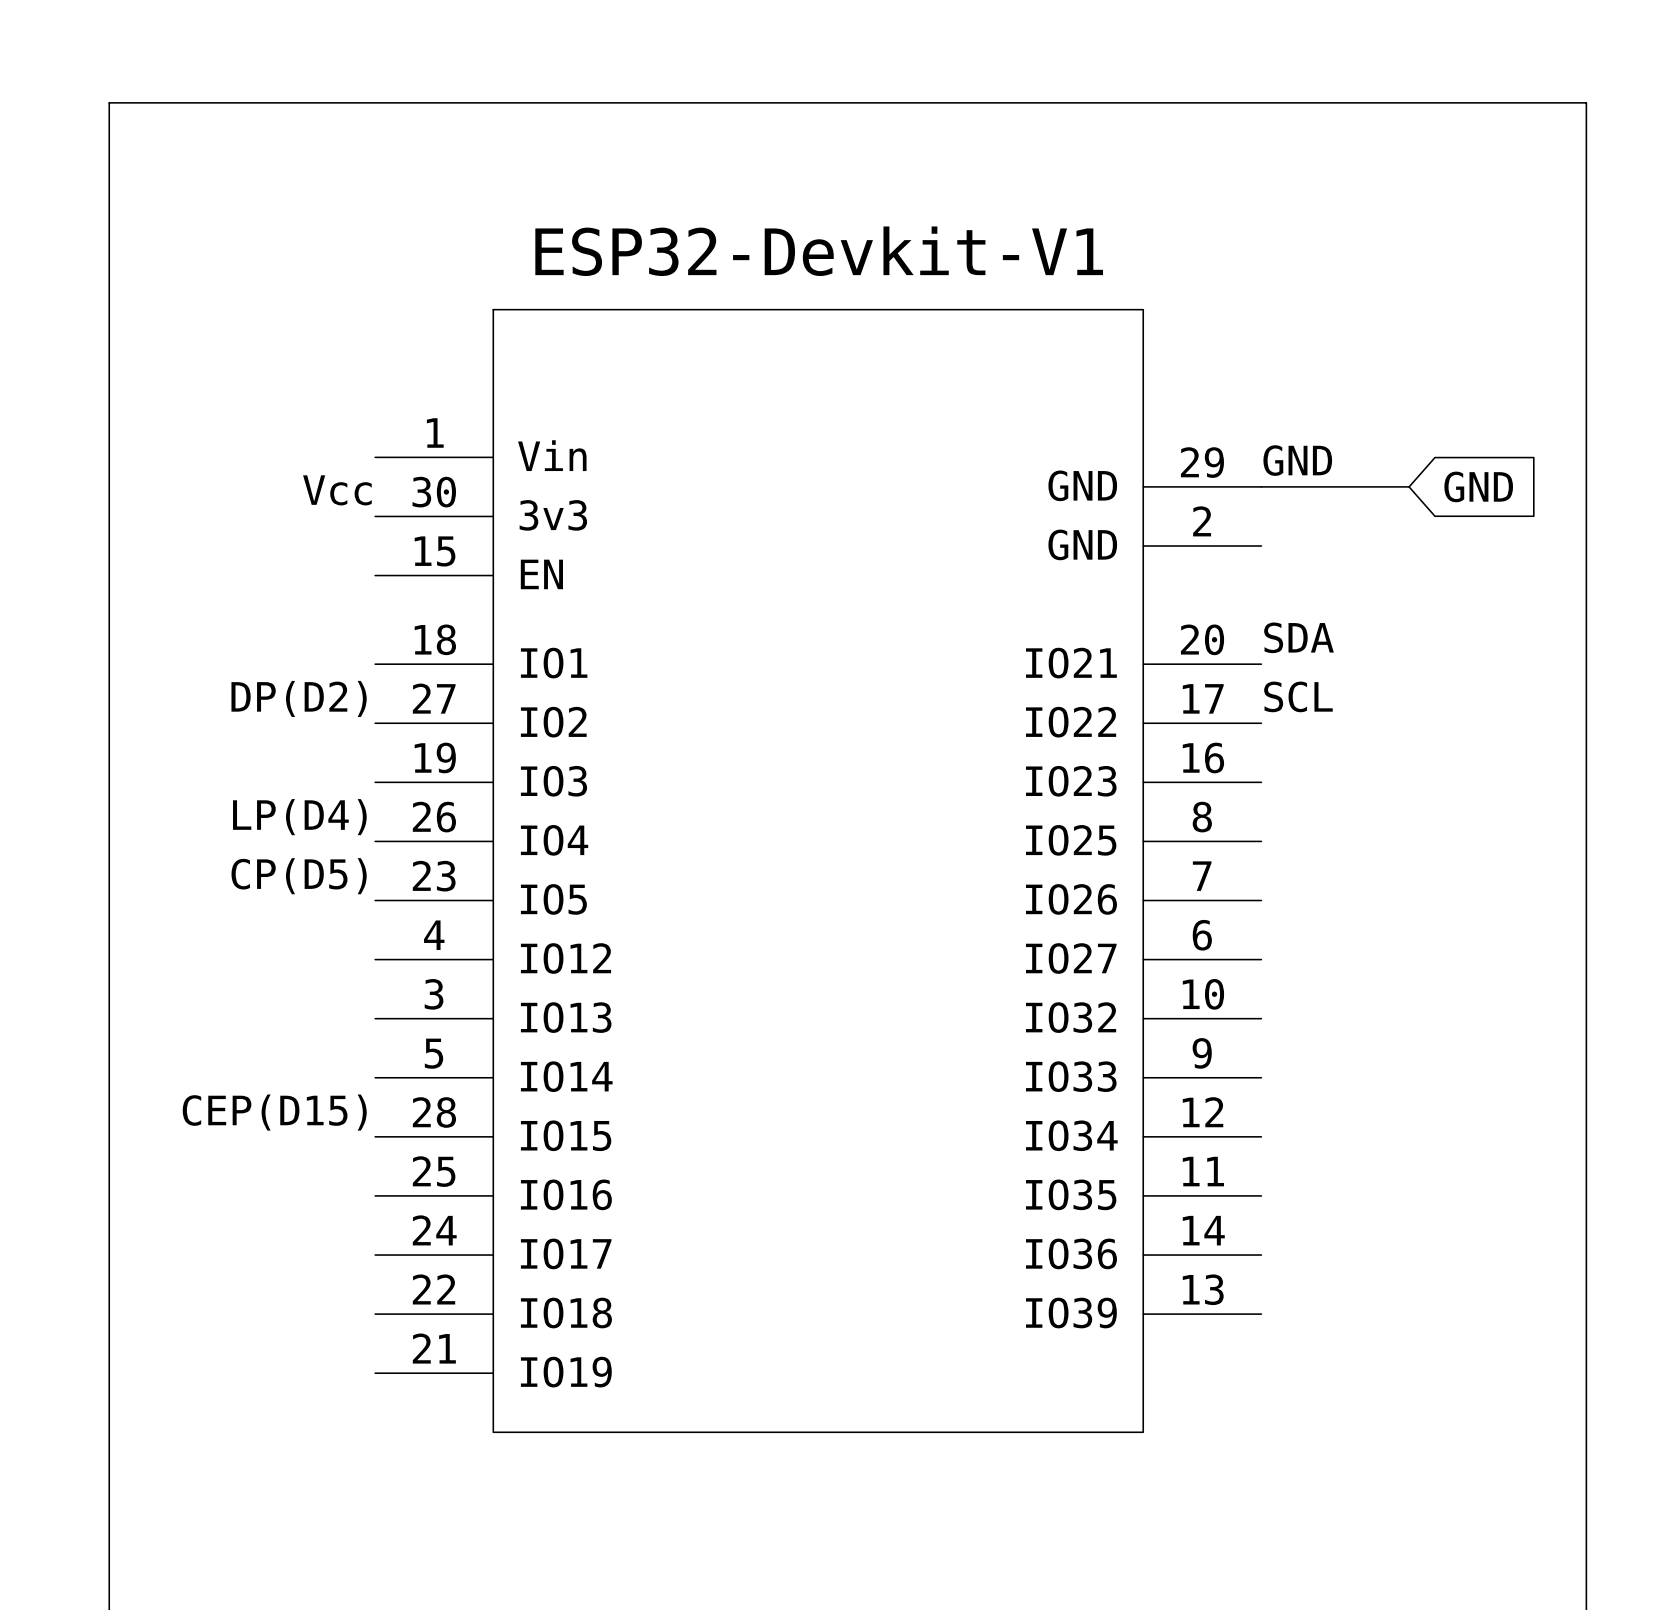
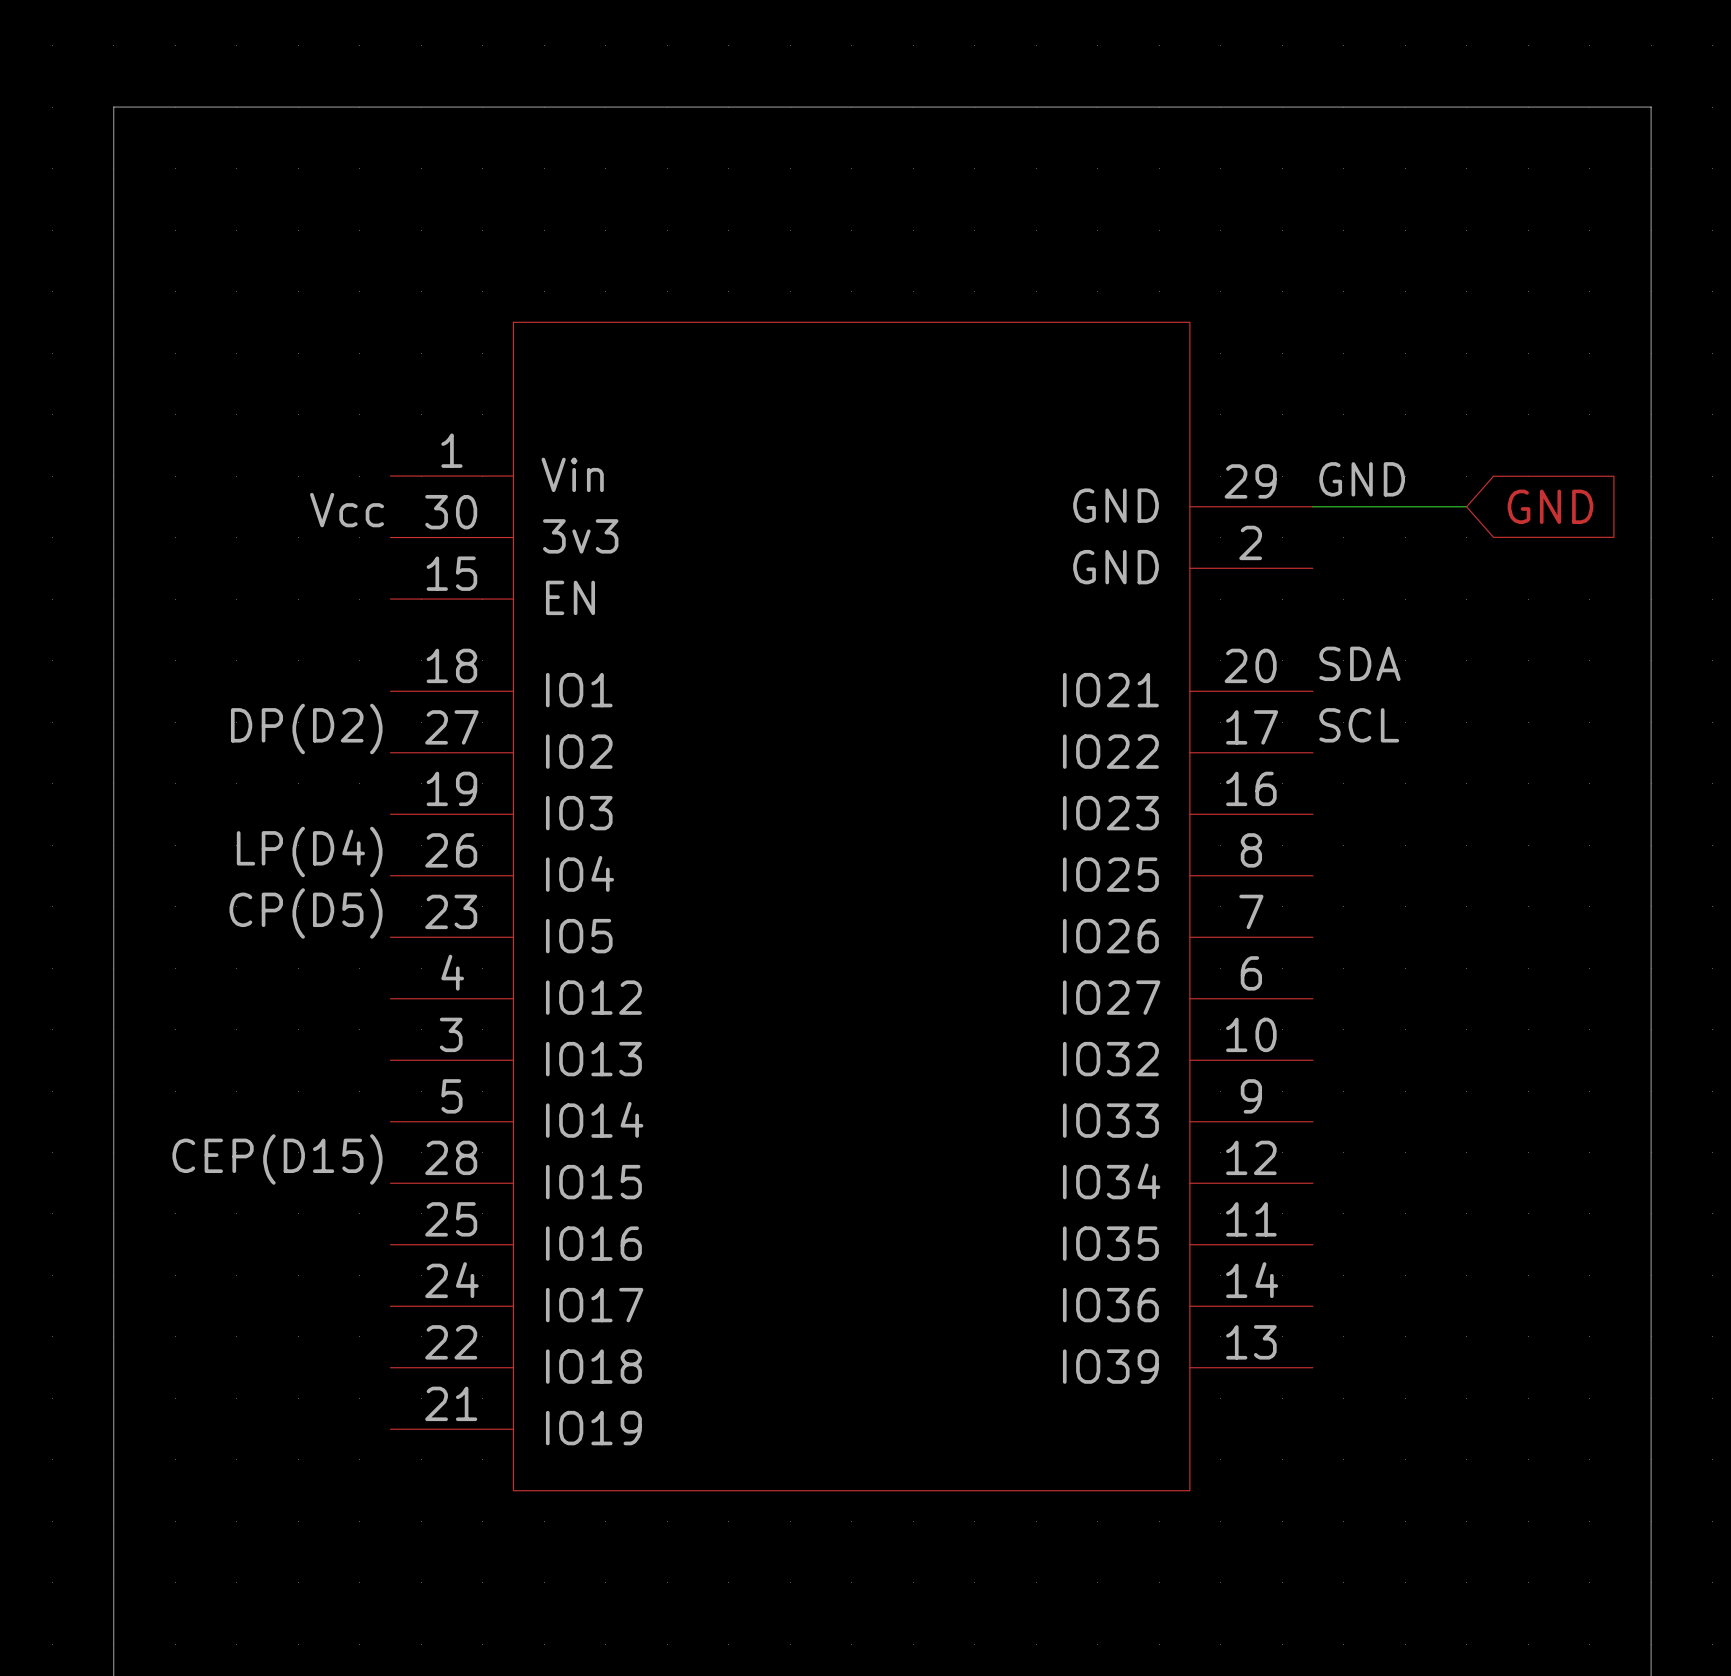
part value: ESP32-Devkit-V1 (819, 251) -> none

